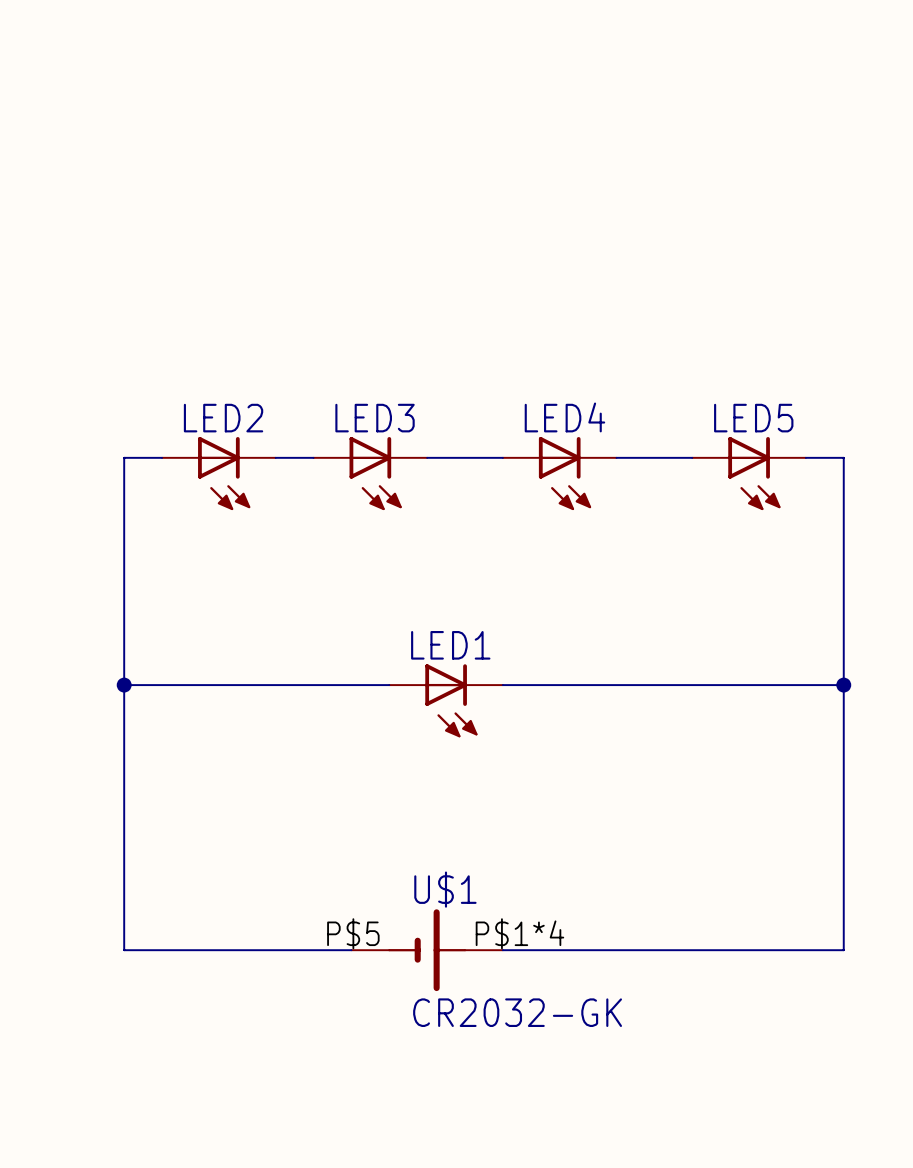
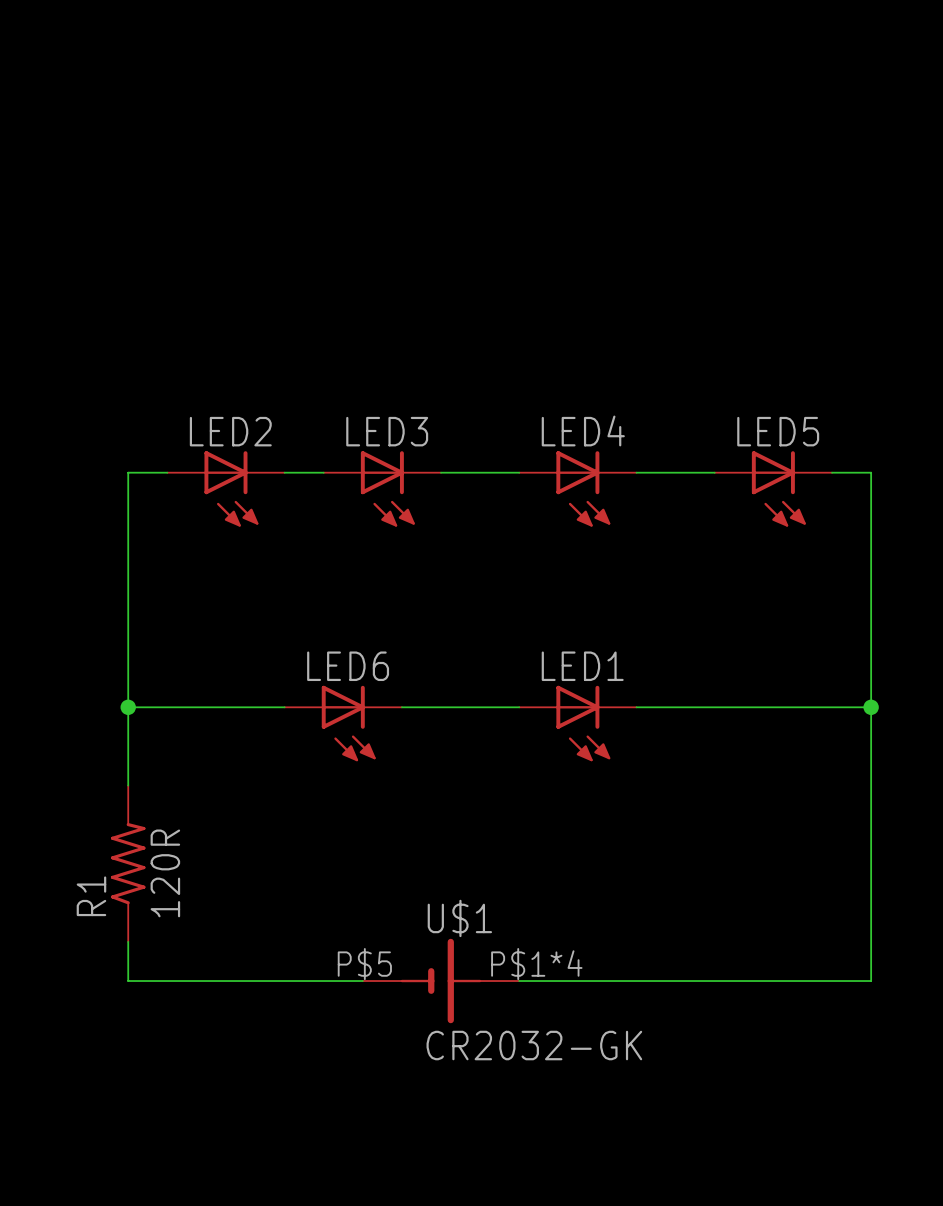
LED6: none -> (343, 723)
LED1 position: (446, 700) -> (577, 723)
R1: none -> 120R (128, 863)

